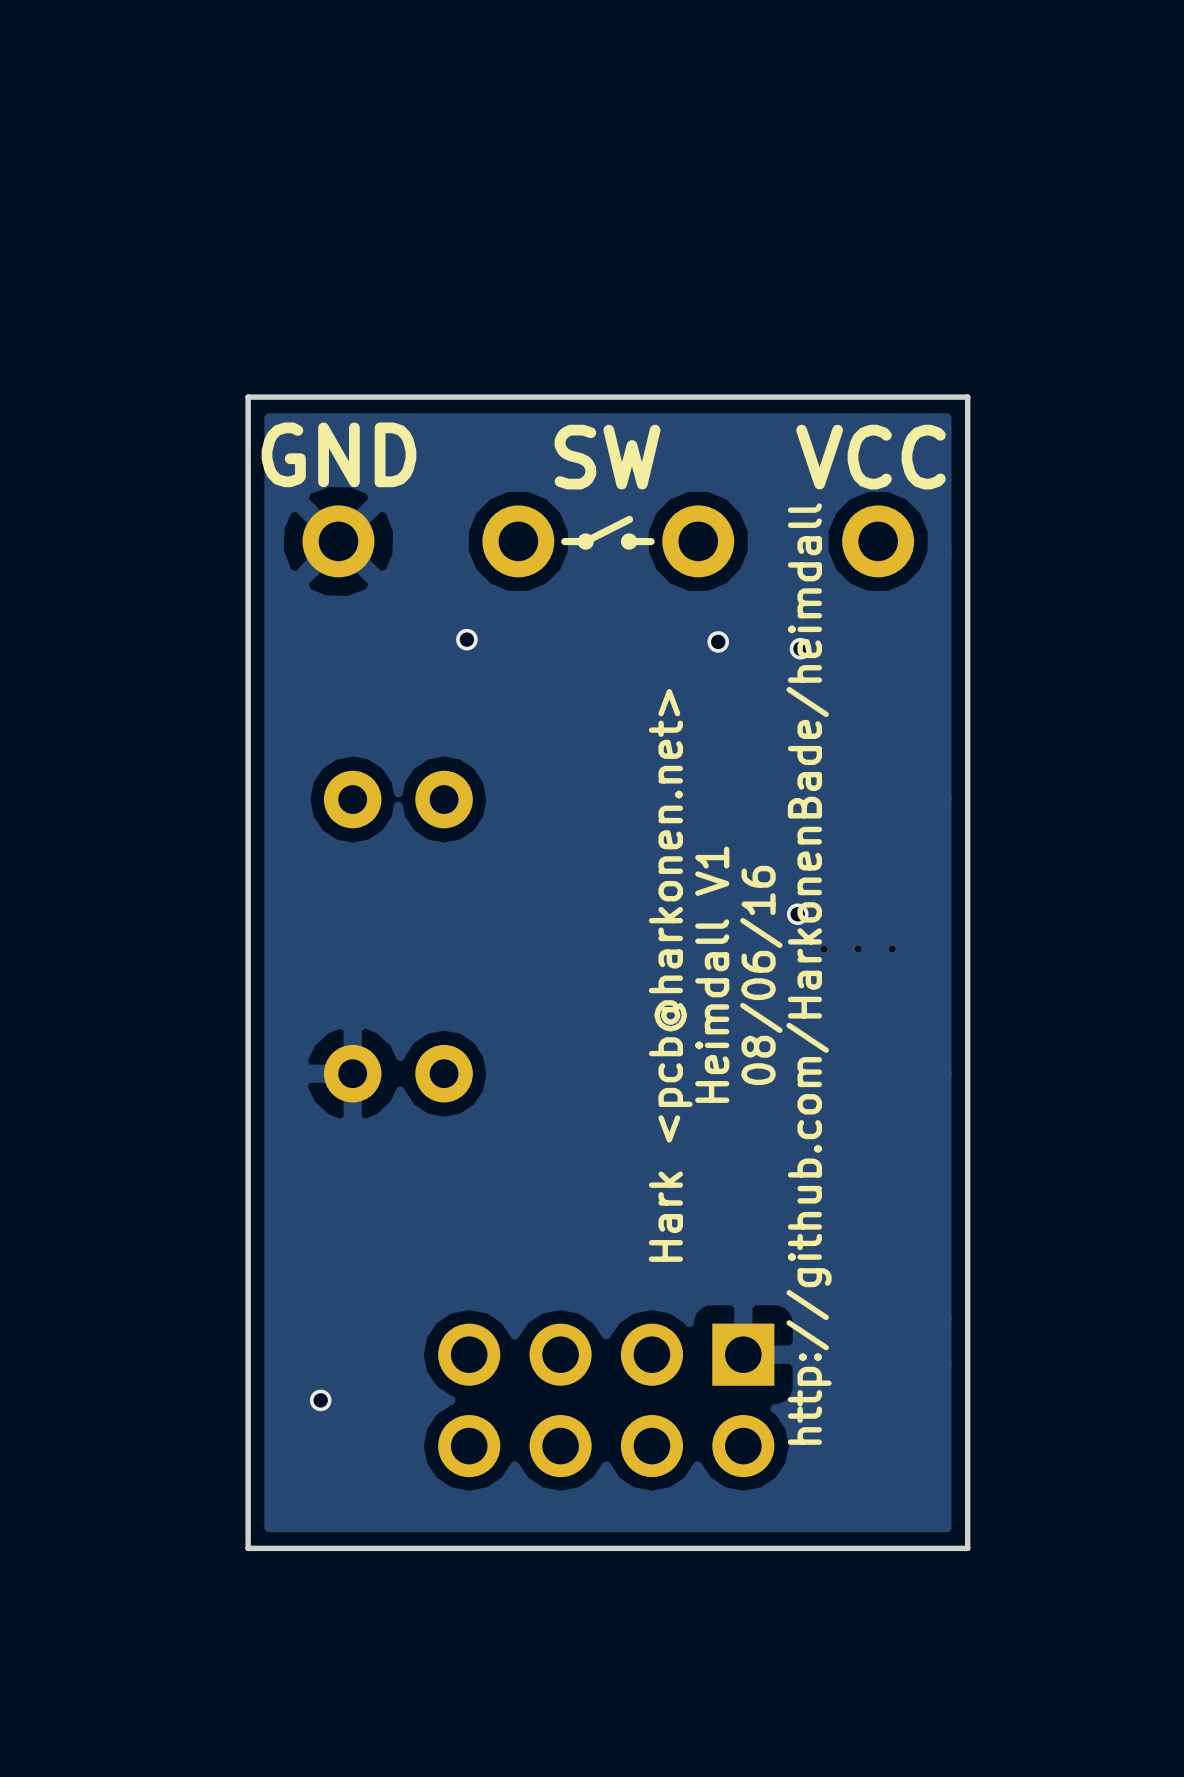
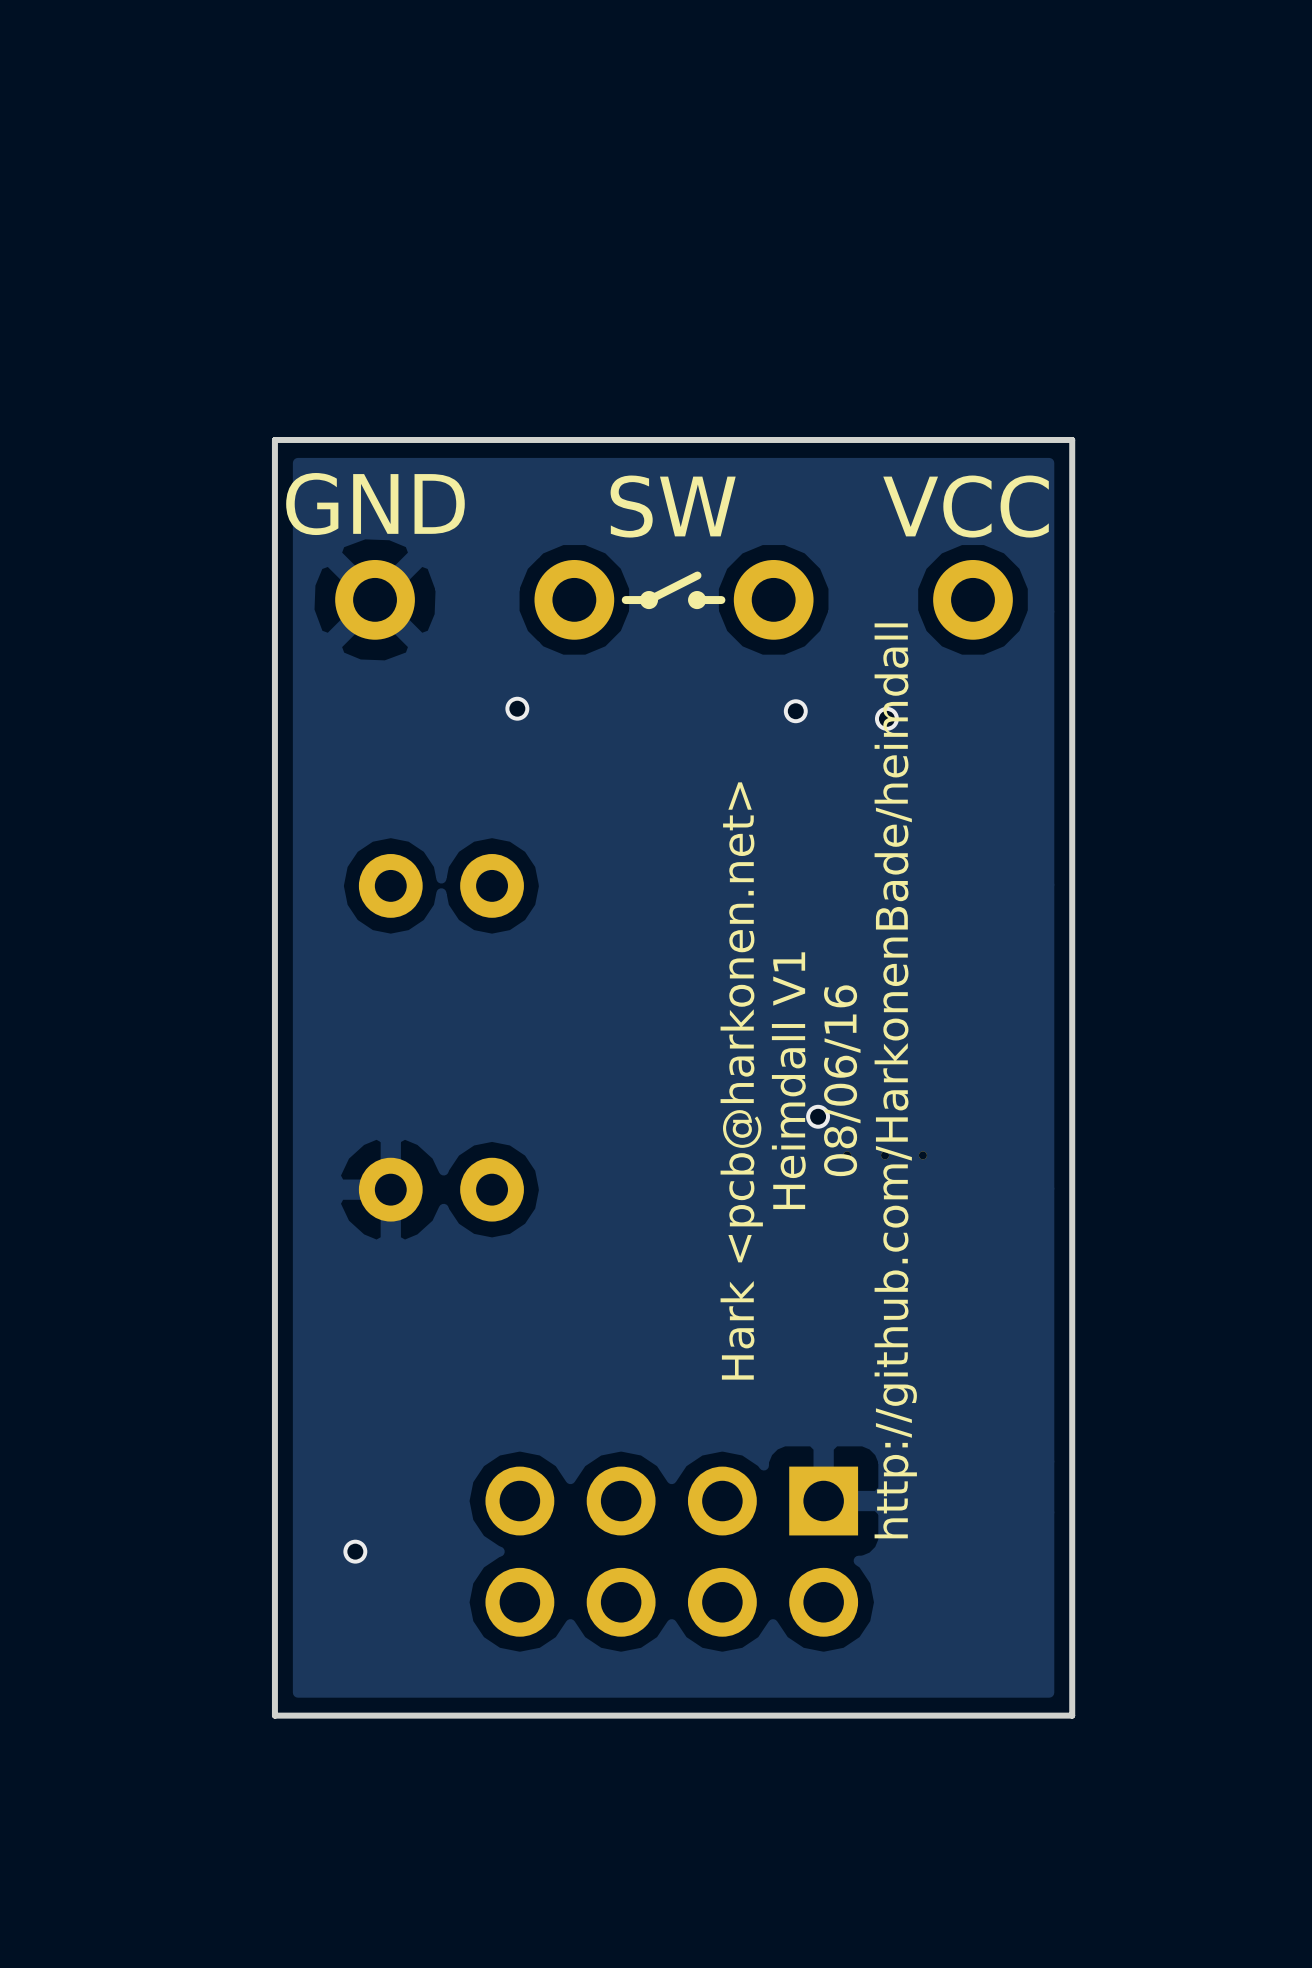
via position: (797, 914) -> (818, 1116)
part position: (858, 949) -> (885, 1155)

